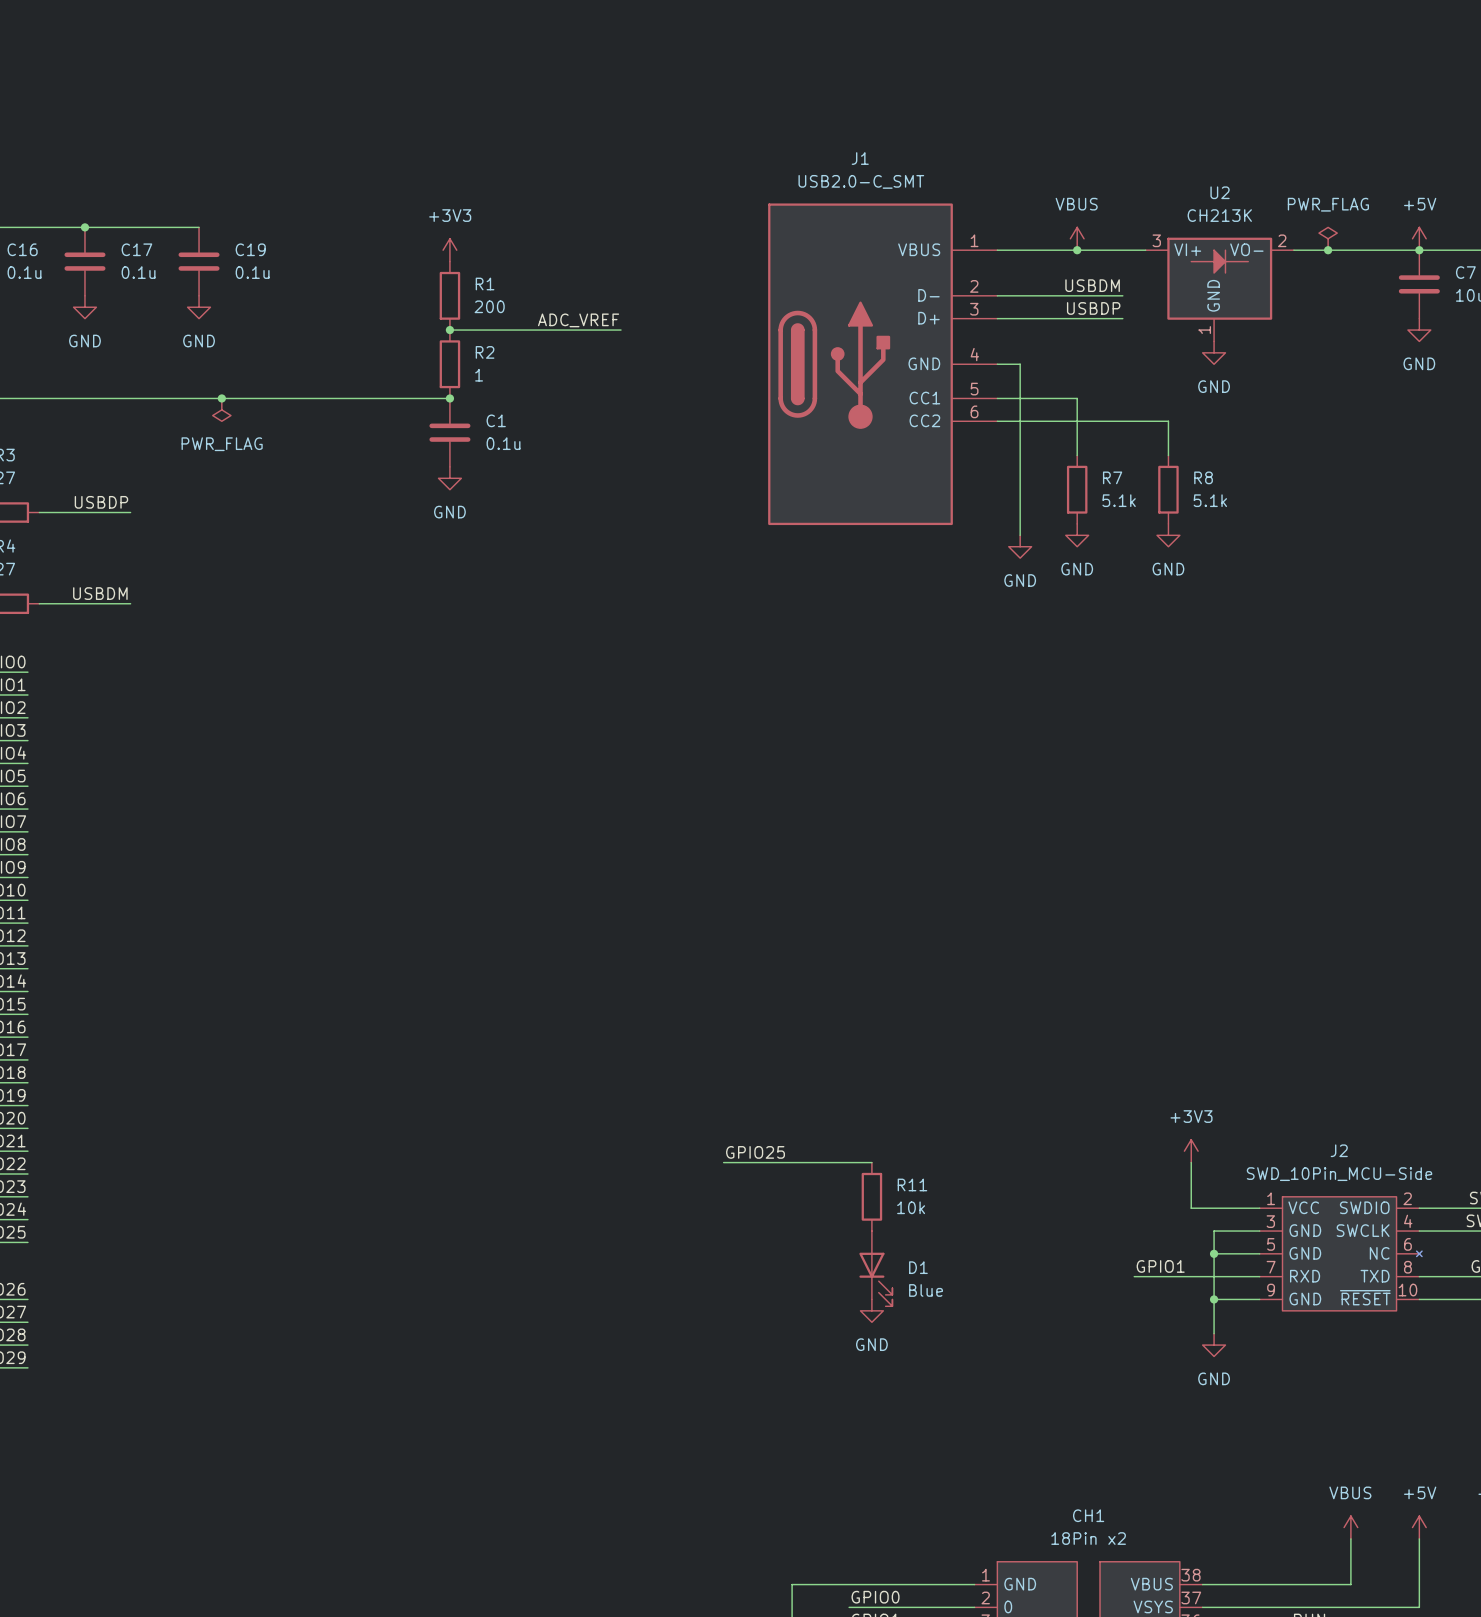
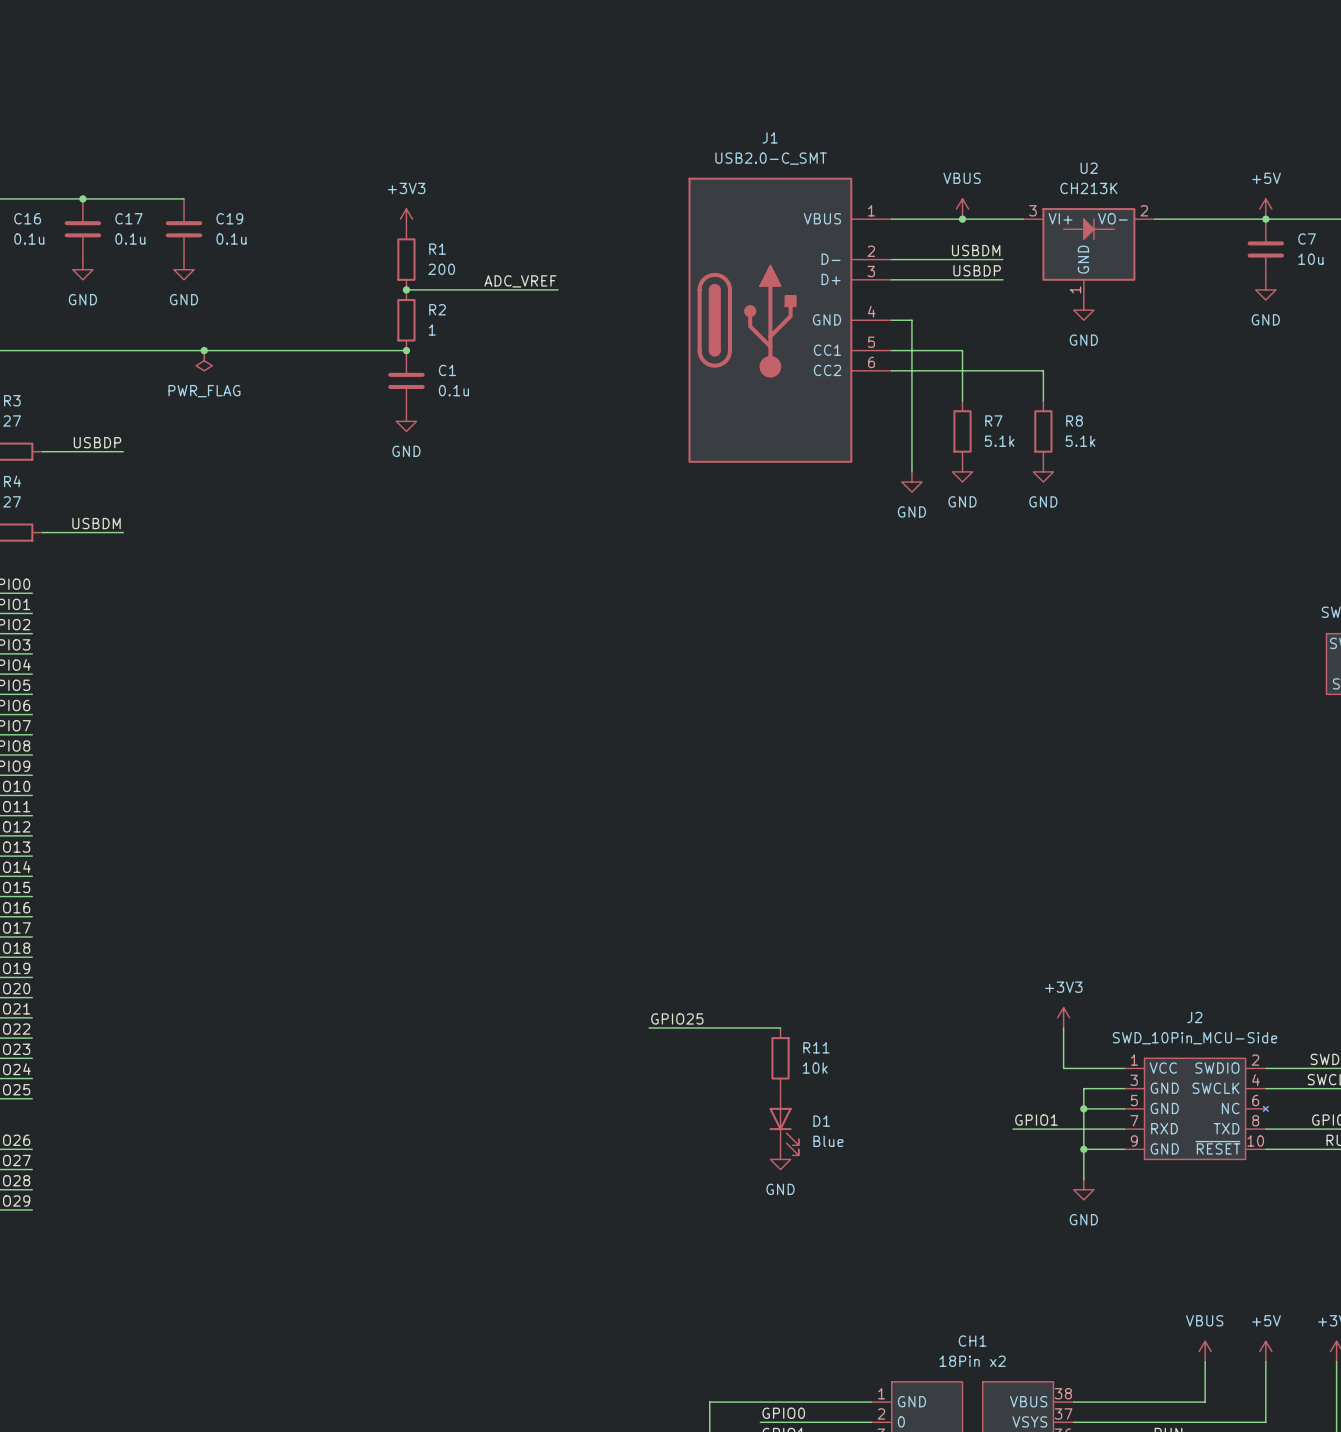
power symbol: PWR_FLAG (1328, 238) -> none
junction: (1328, 250) -> none

